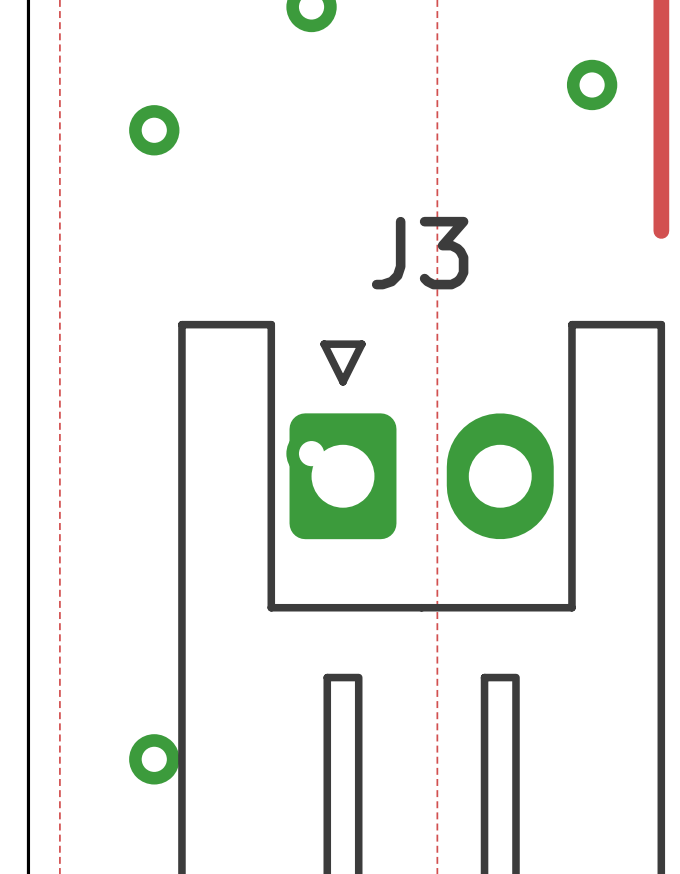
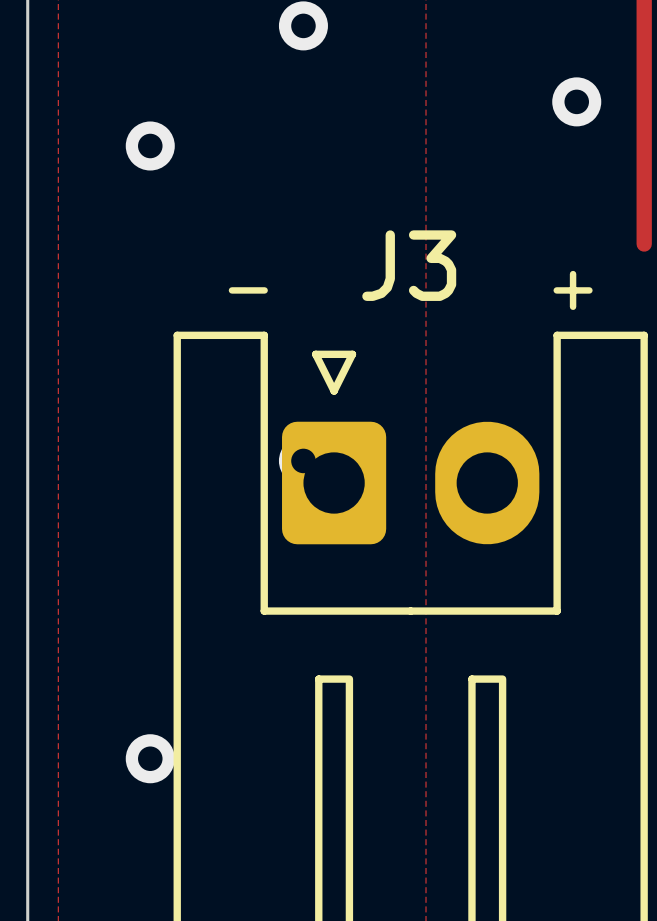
text: none -> - (248, 290)
text: none -> + (573, 290)

